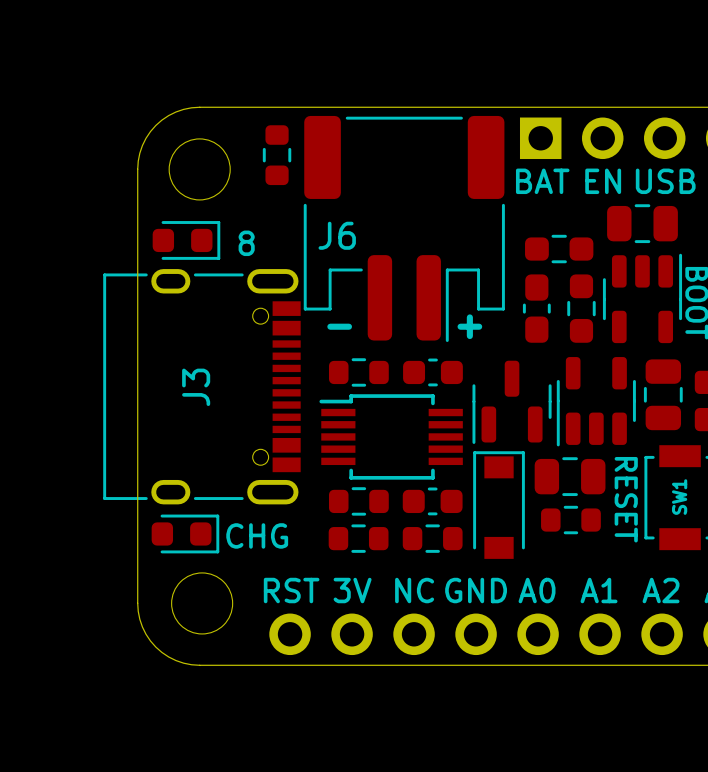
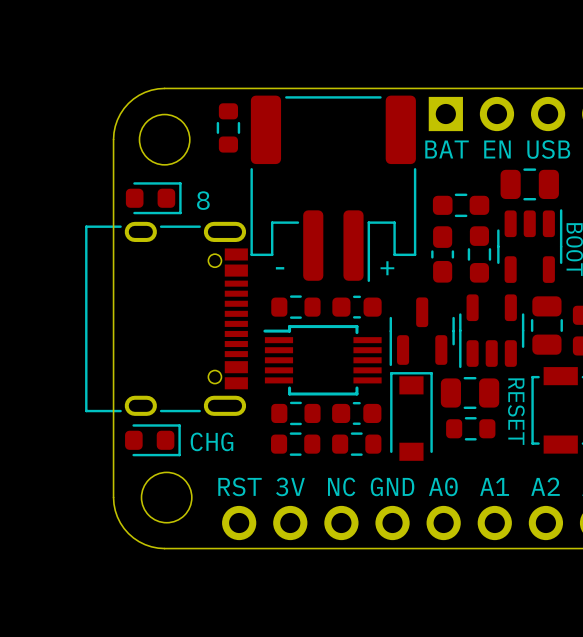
J6 name: J6 (337, 235) -> none
J3 name: J3 (196, 387) -> none
SW1 name: SW1 (679, 497) -> none

